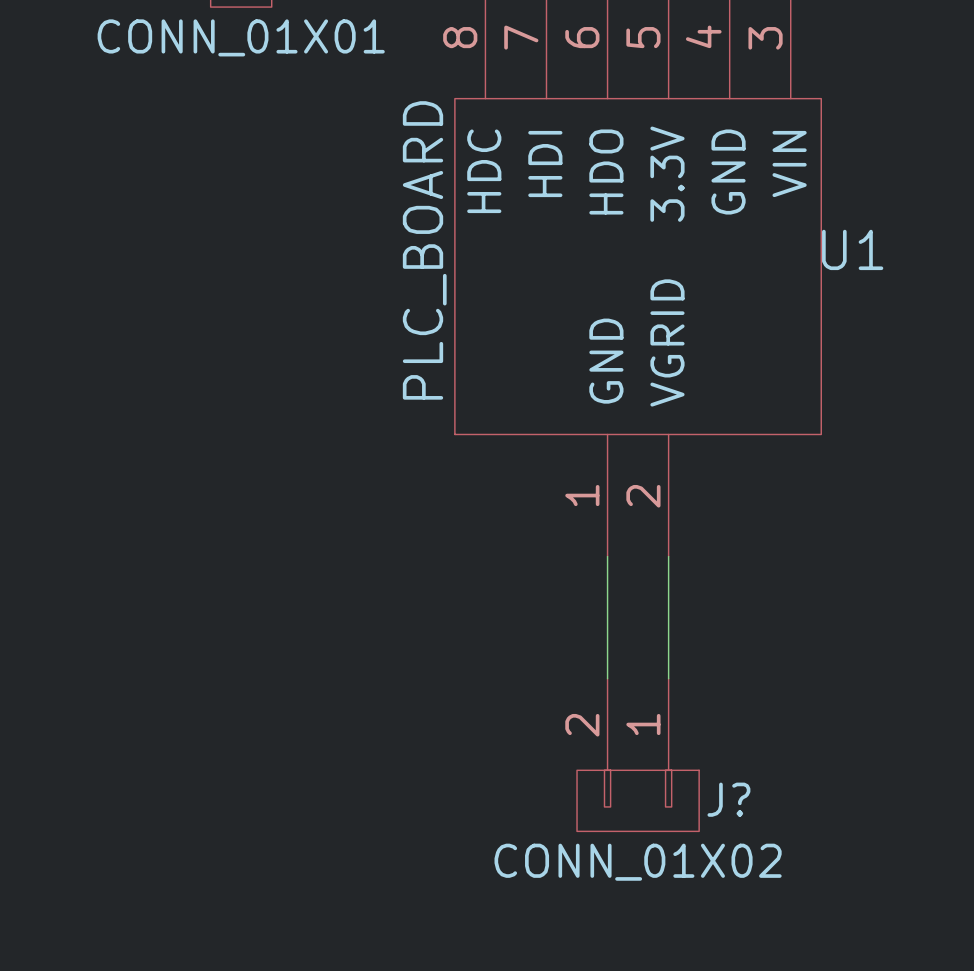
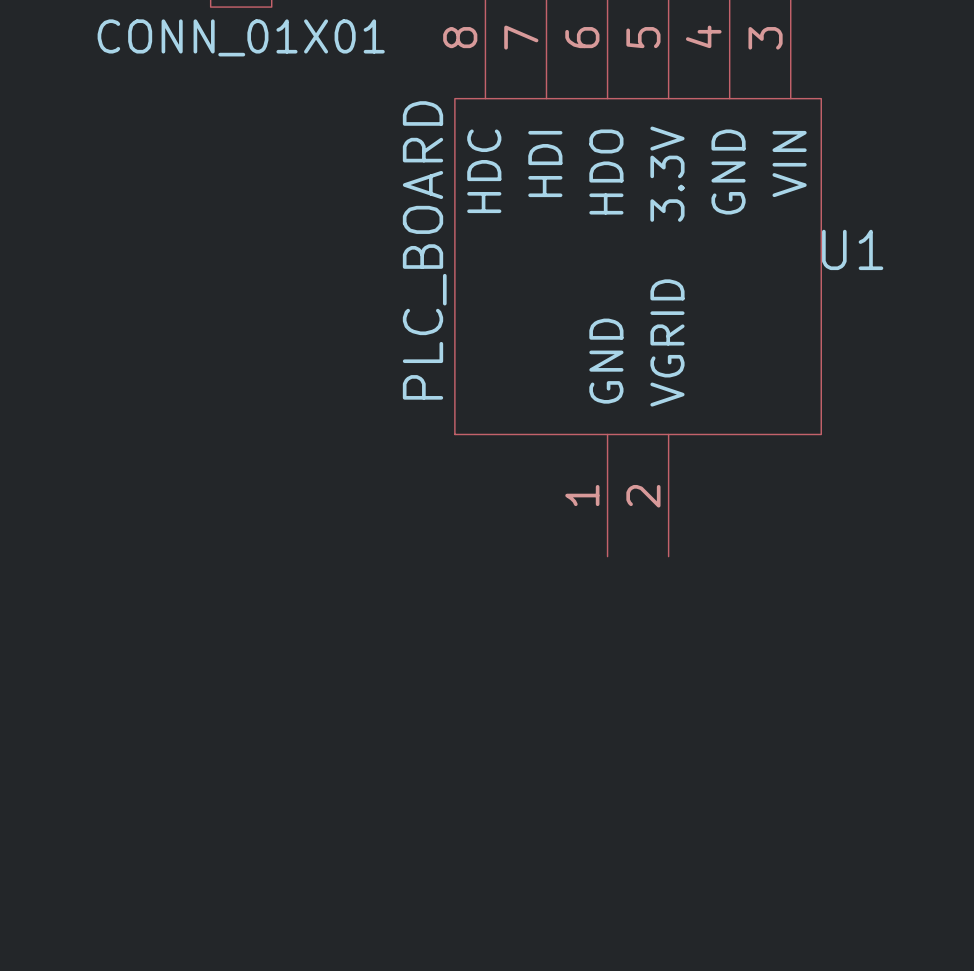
wire: (607, 556) (607, 678) -> none
wire: (668, 556) (668, 678) -> none
J?: CONN_01X02 (638, 755) -> none

